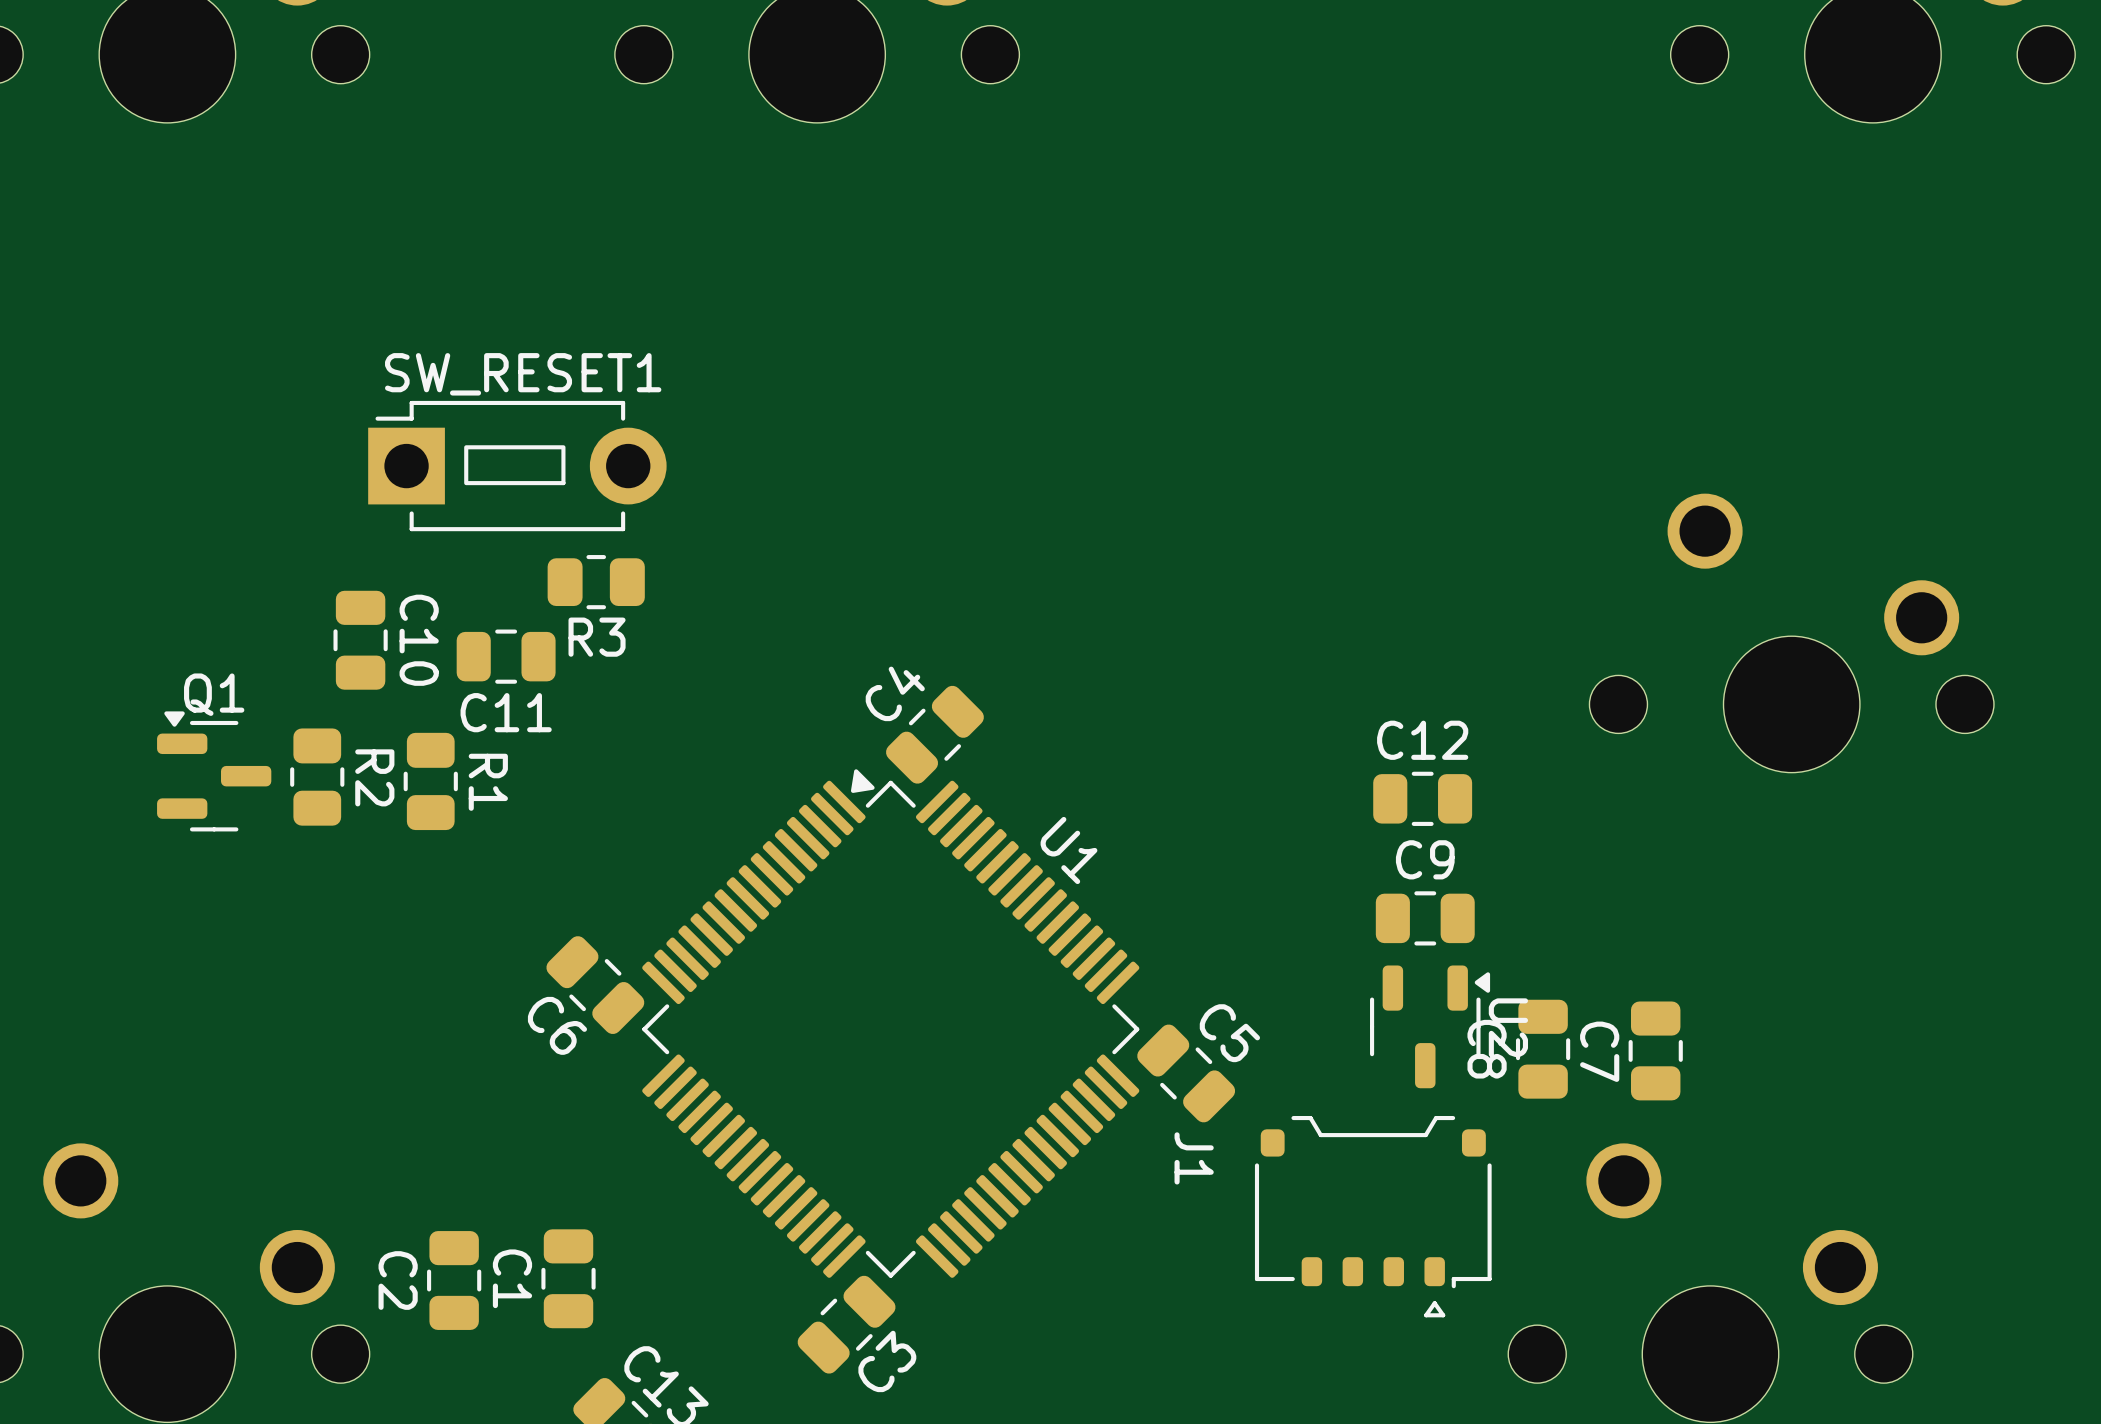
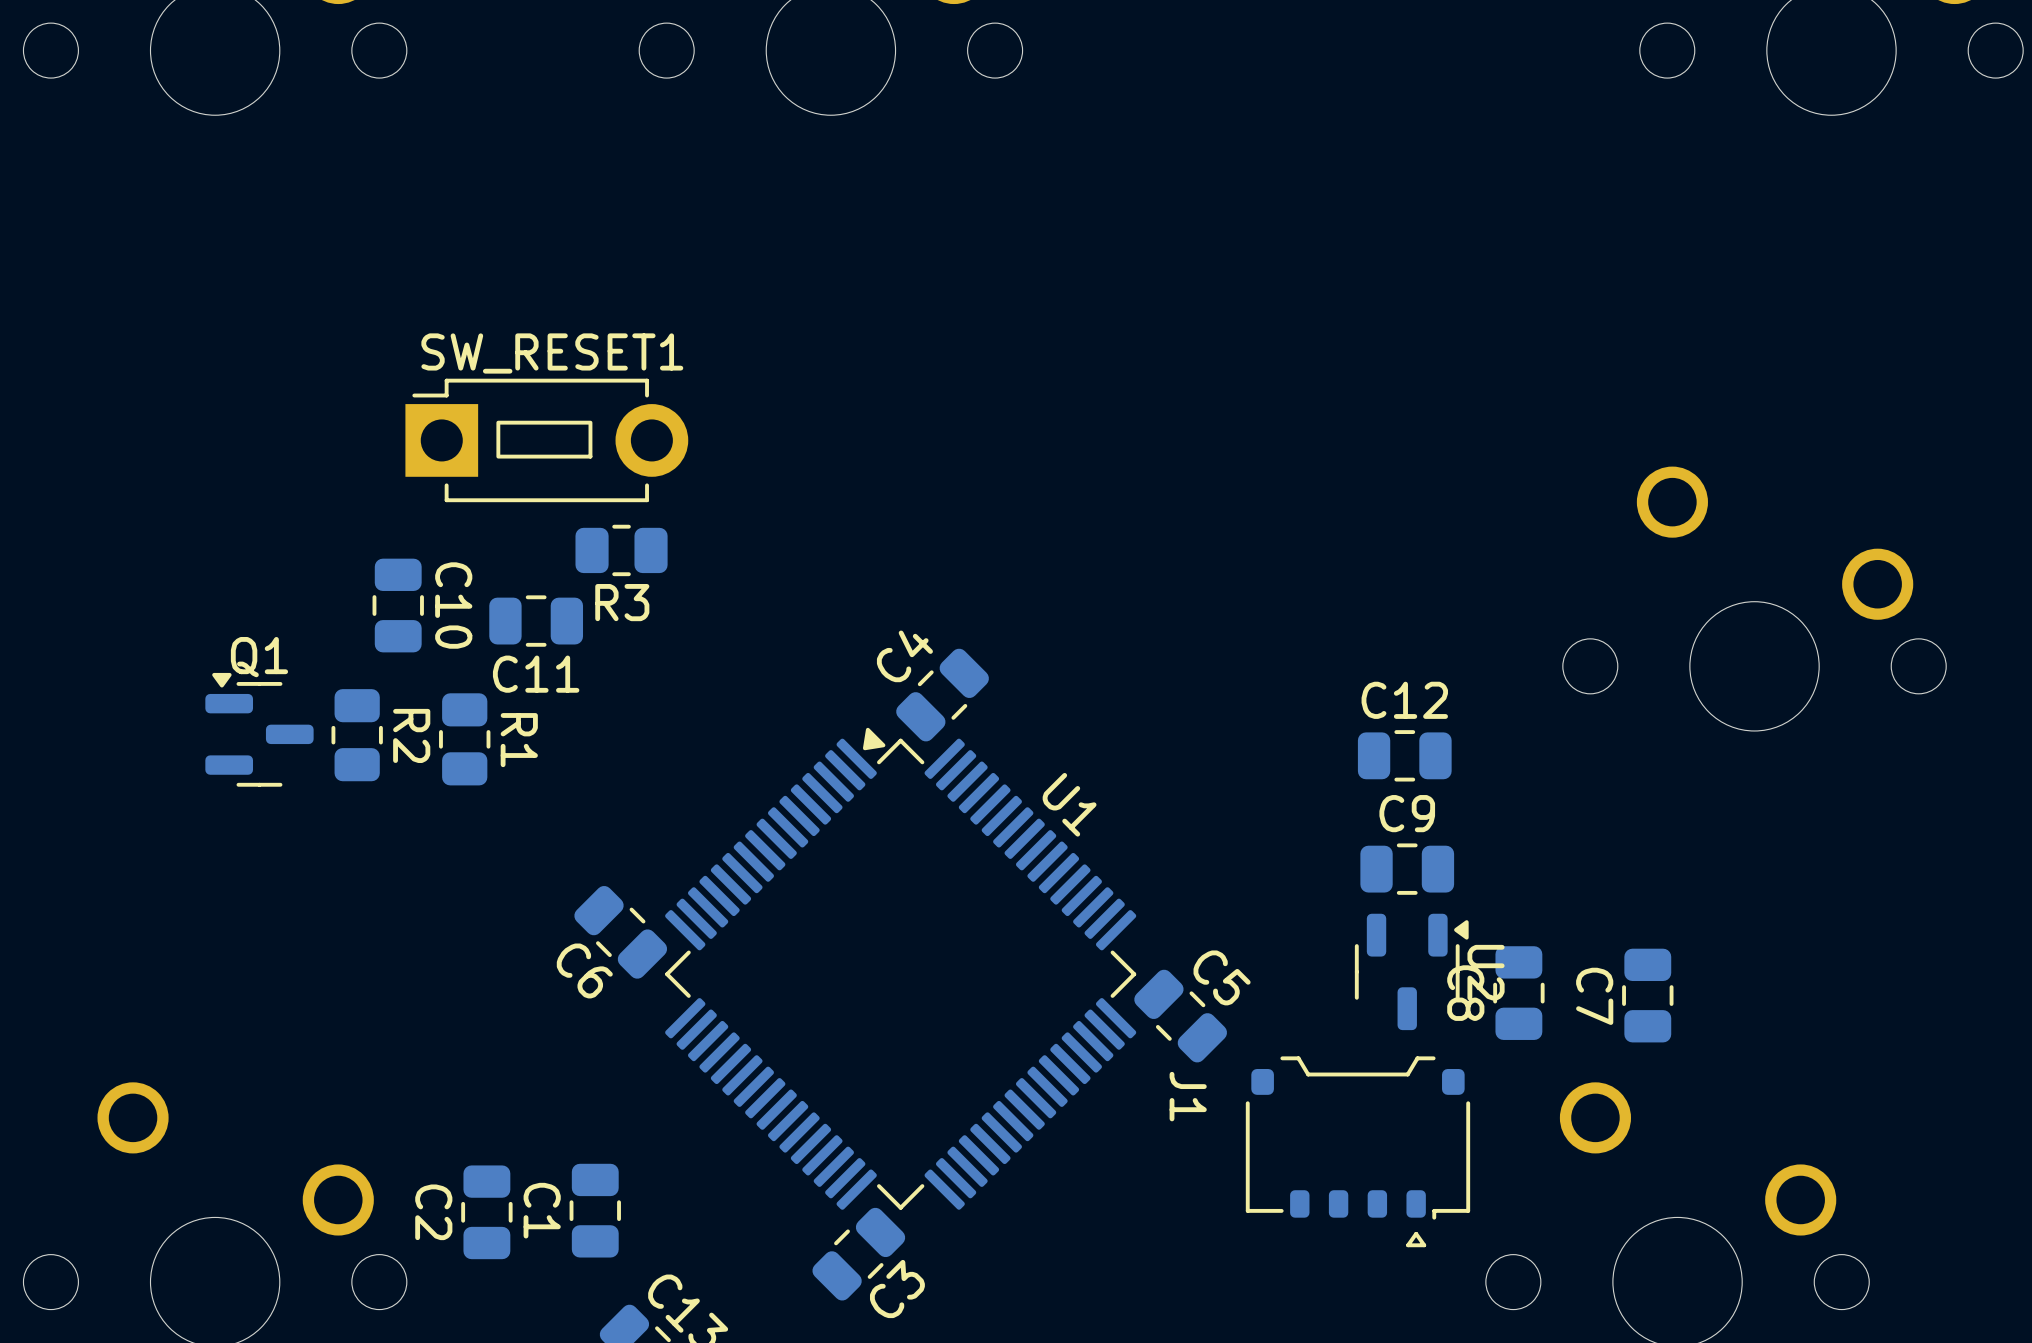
C7 position: (1655, 1050) -> (1647, 995)

